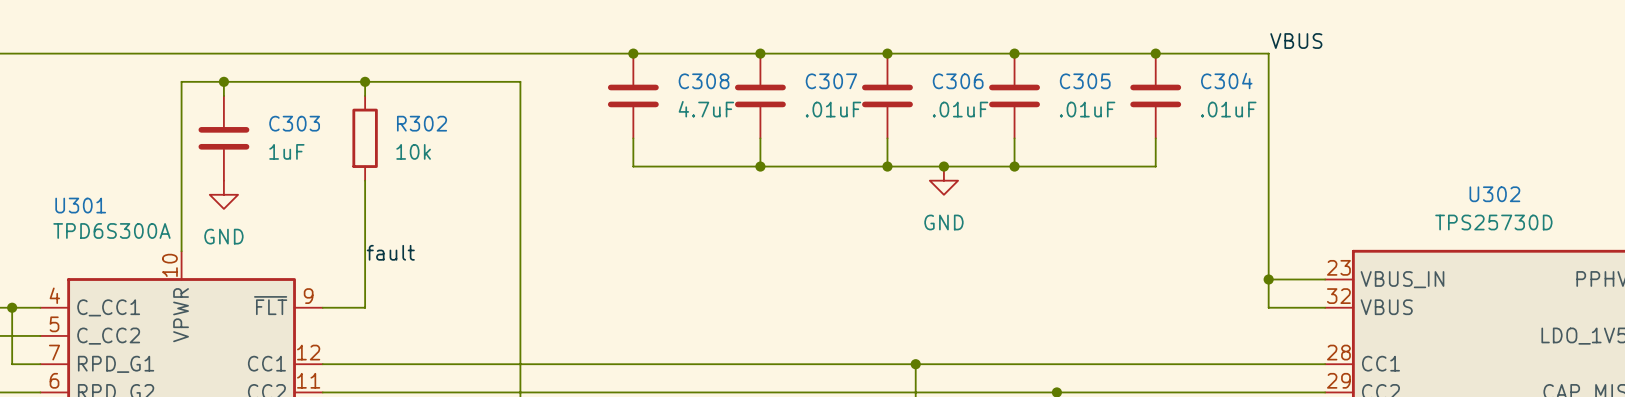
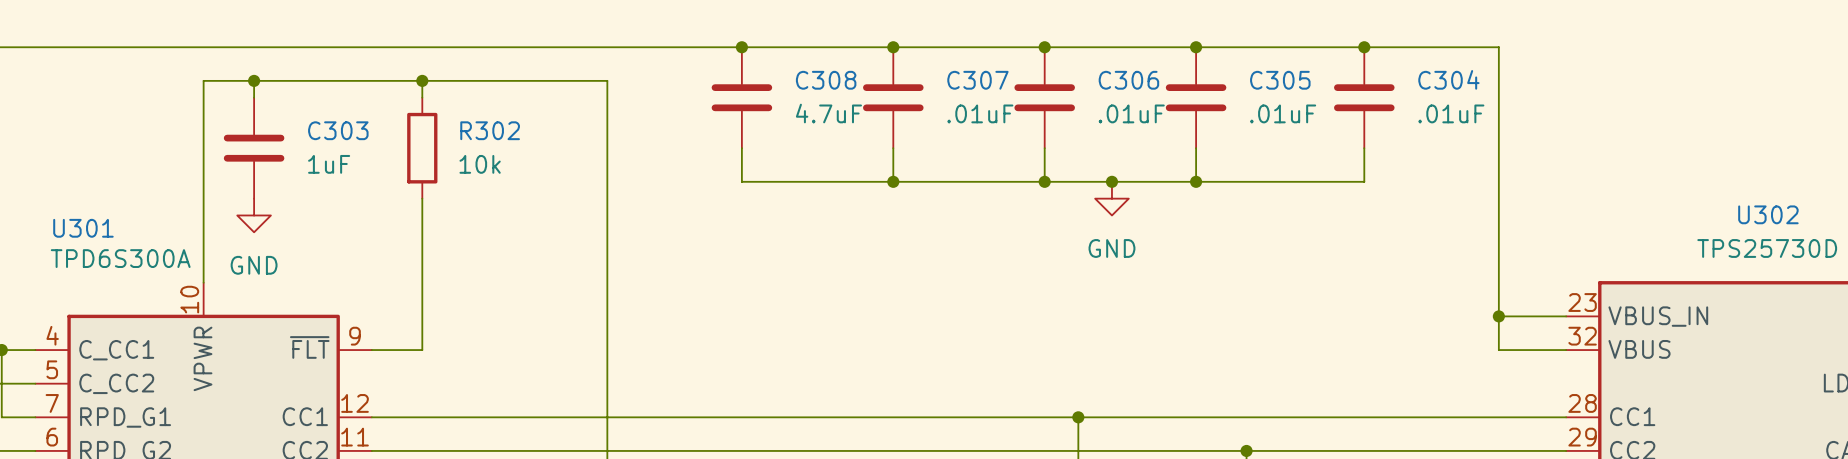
label: VBUS (1296, 41) -> none
label: fault (390, 252) -> none

